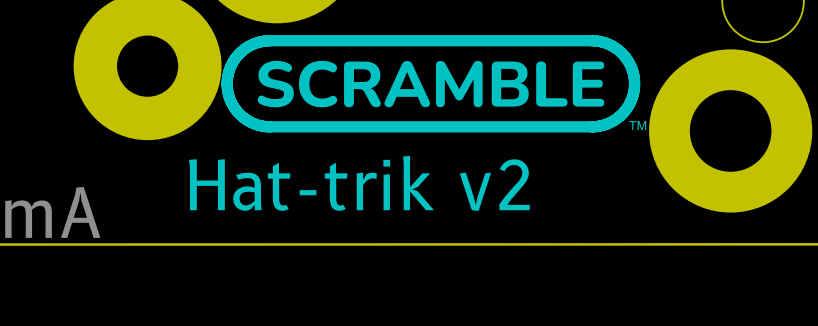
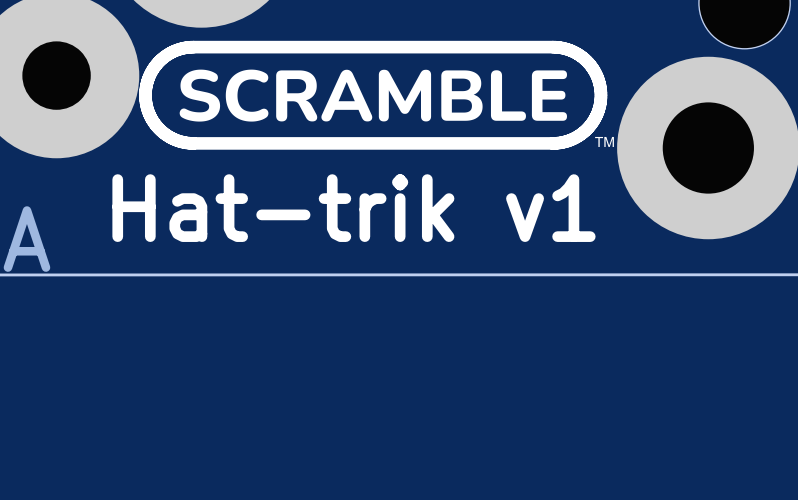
text: Hat-trik v2 (359, 183) -> Hat-trik v1 (353, 208)

